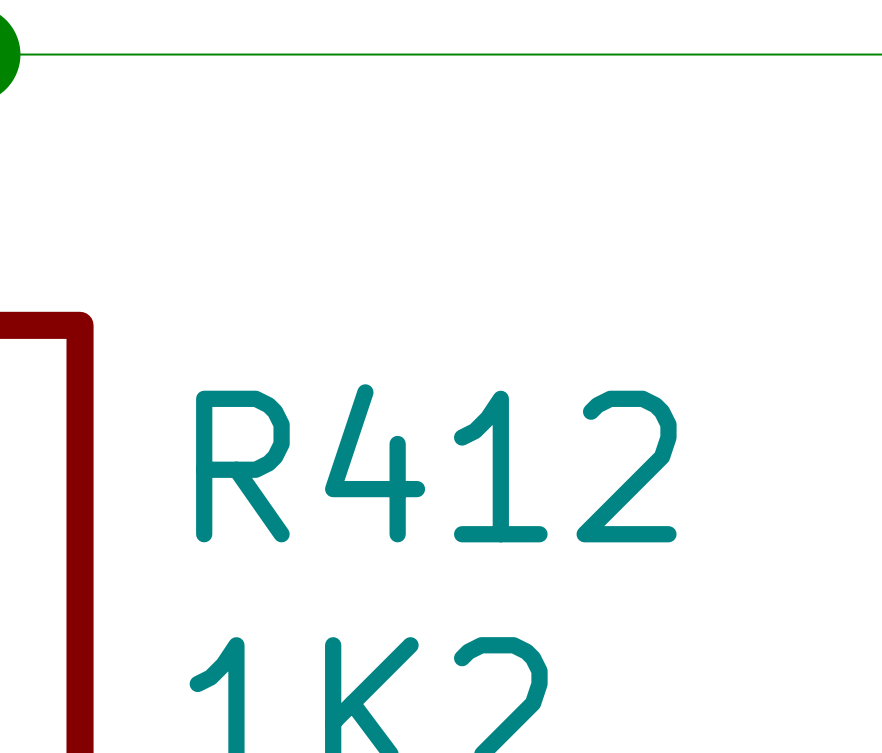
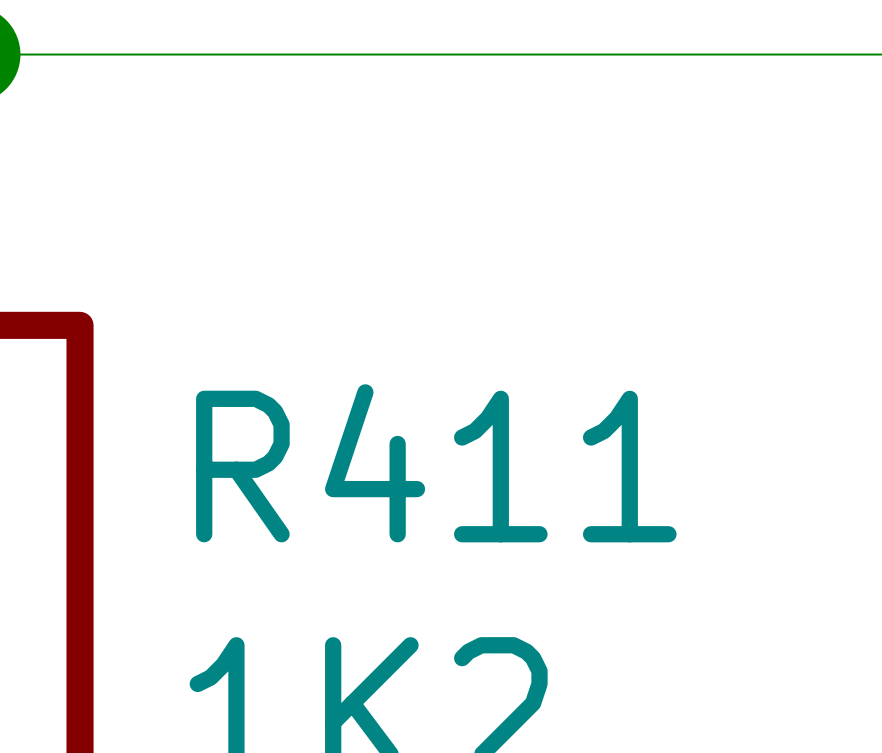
R412 name: R412 (436, 463) -> R411 (436, 463)

